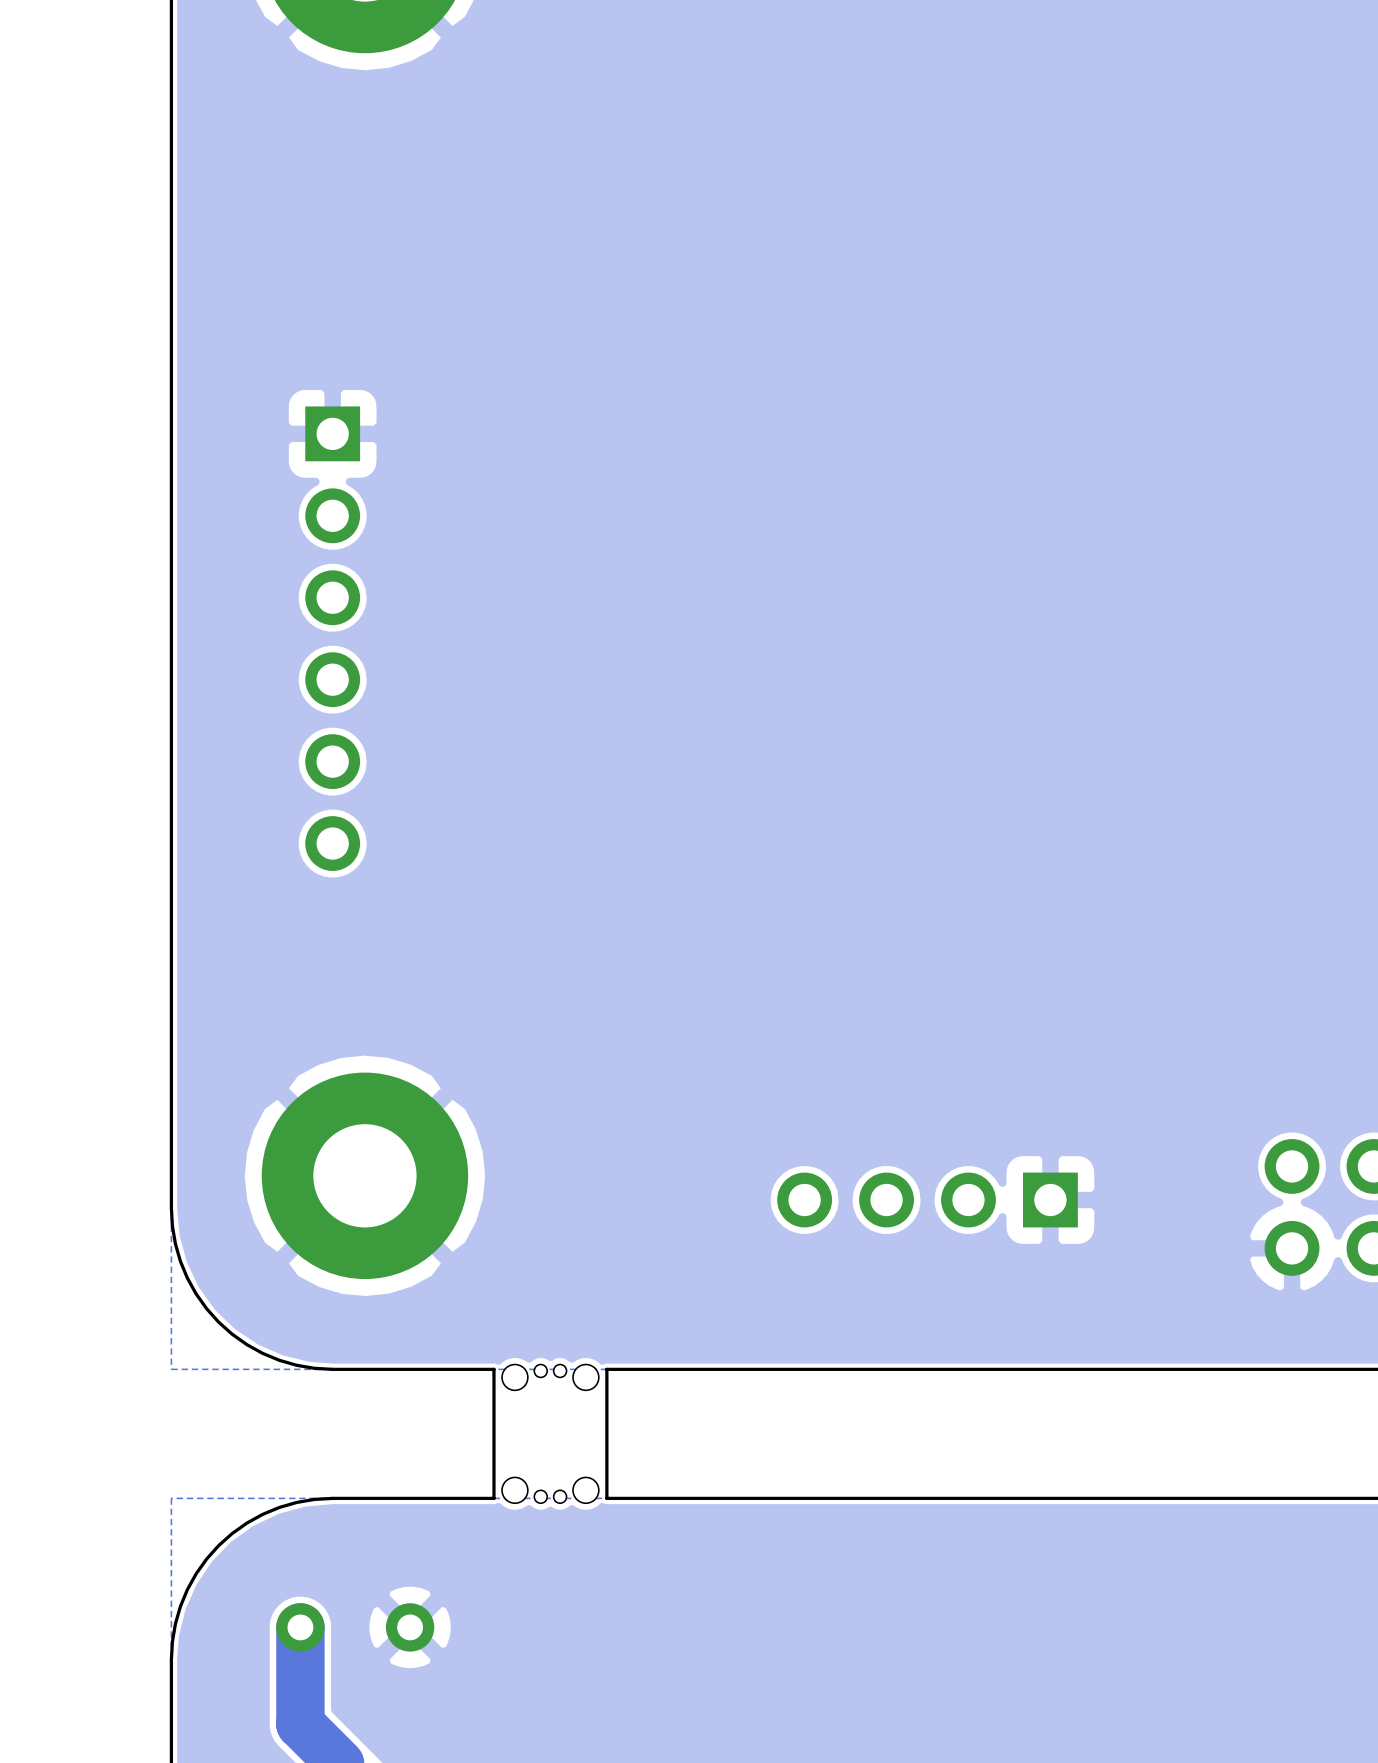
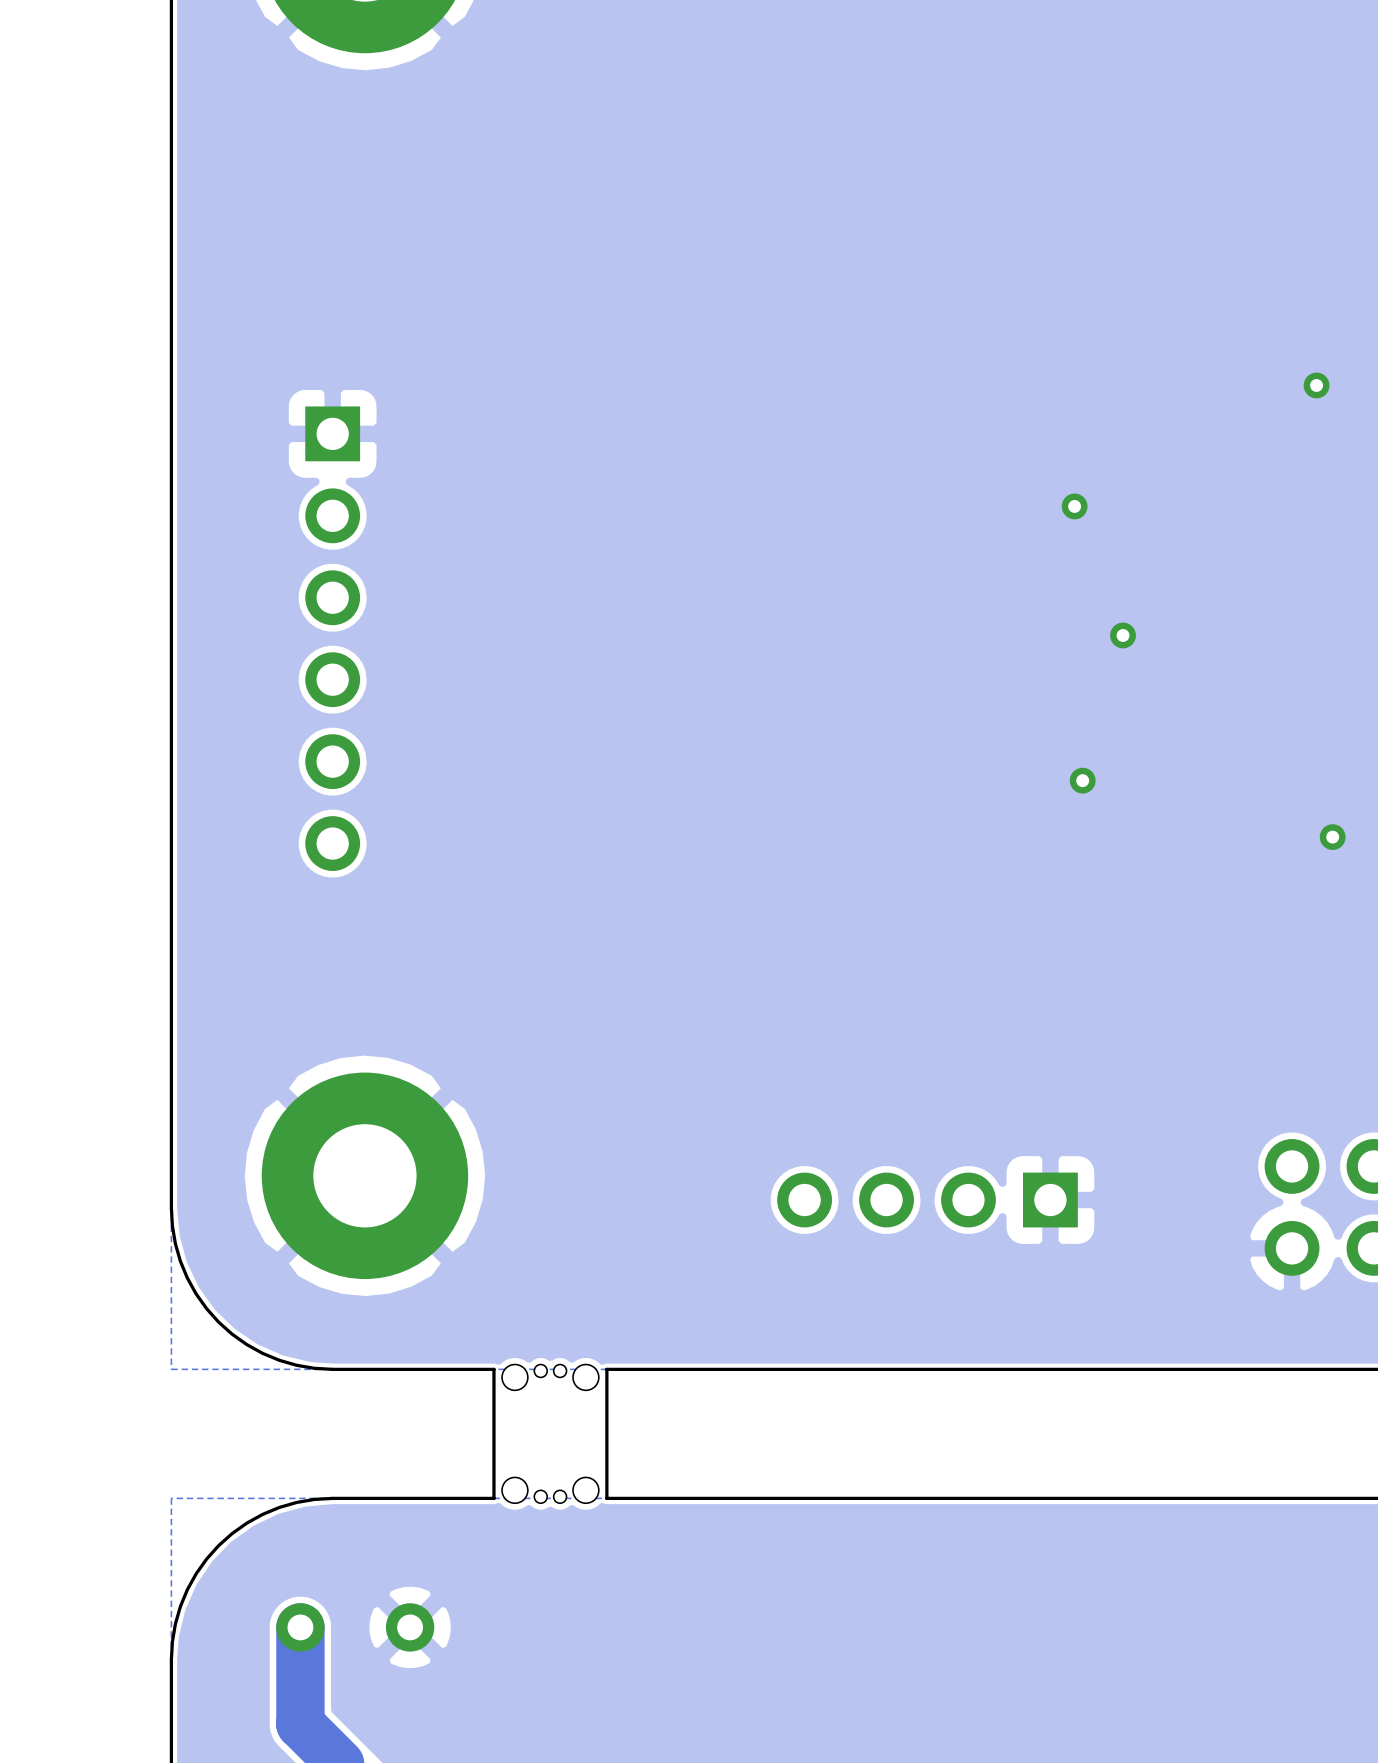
via: none -> (1316, 385)
via: none -> (1074, 506)
via: none -> (1123, 635)
via: none -> (1082, 780)
via: none -> (1332, 837)

